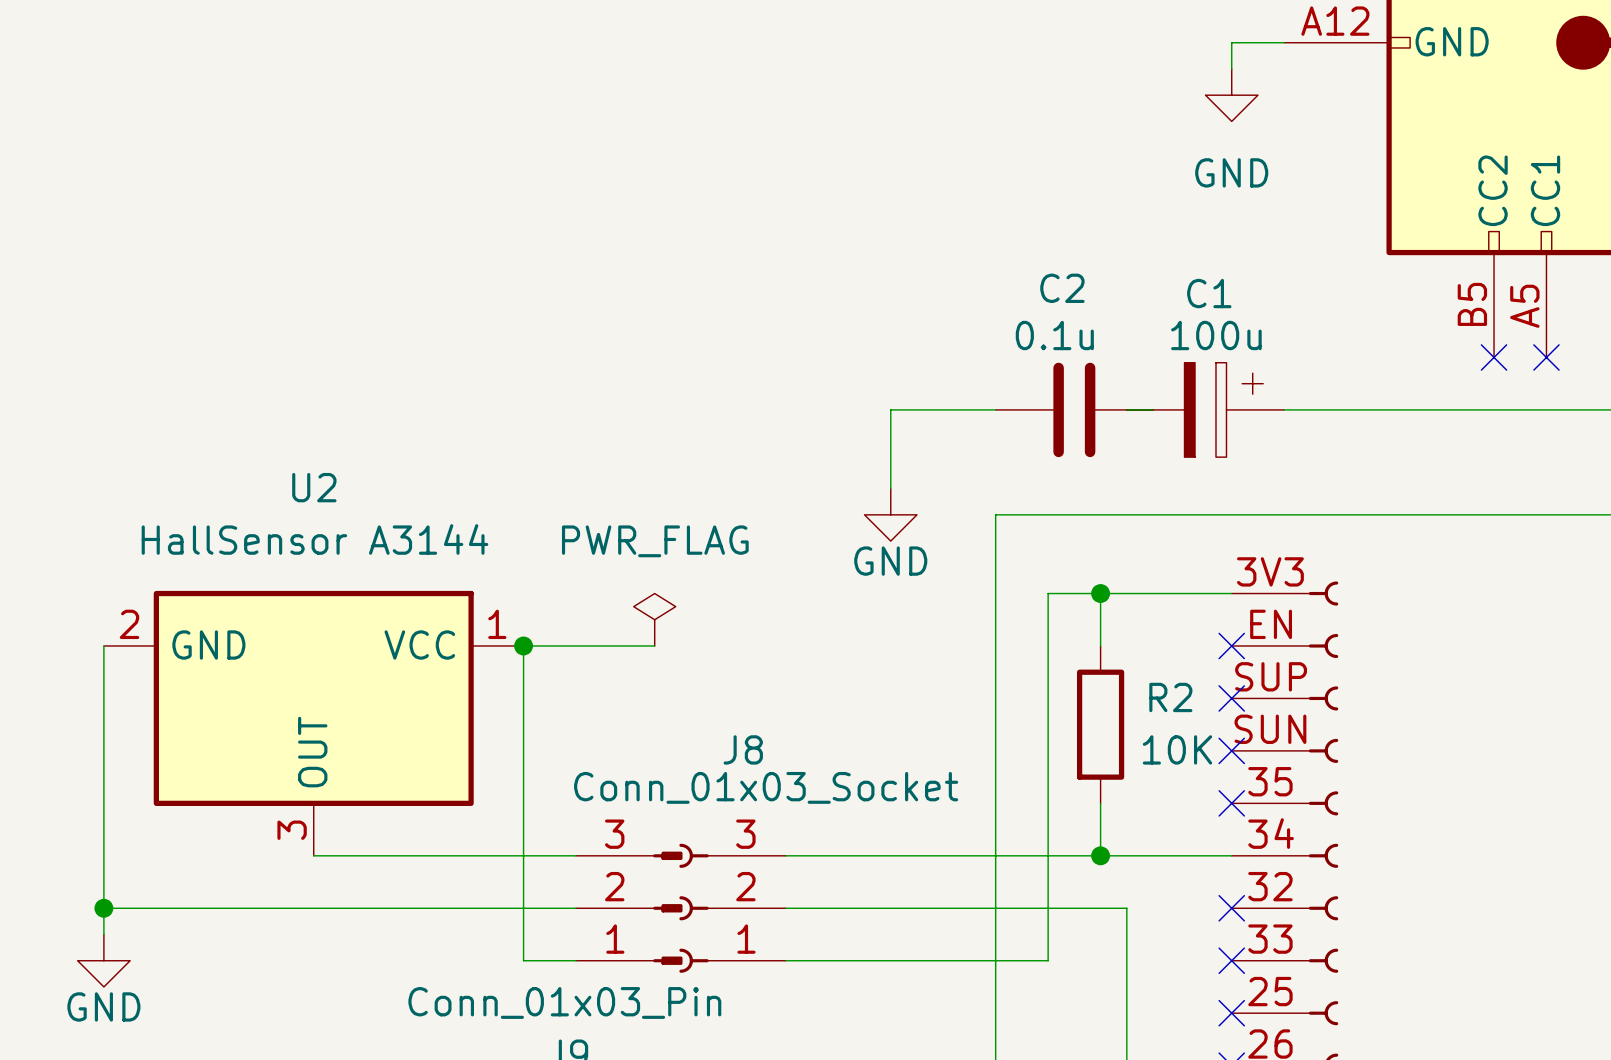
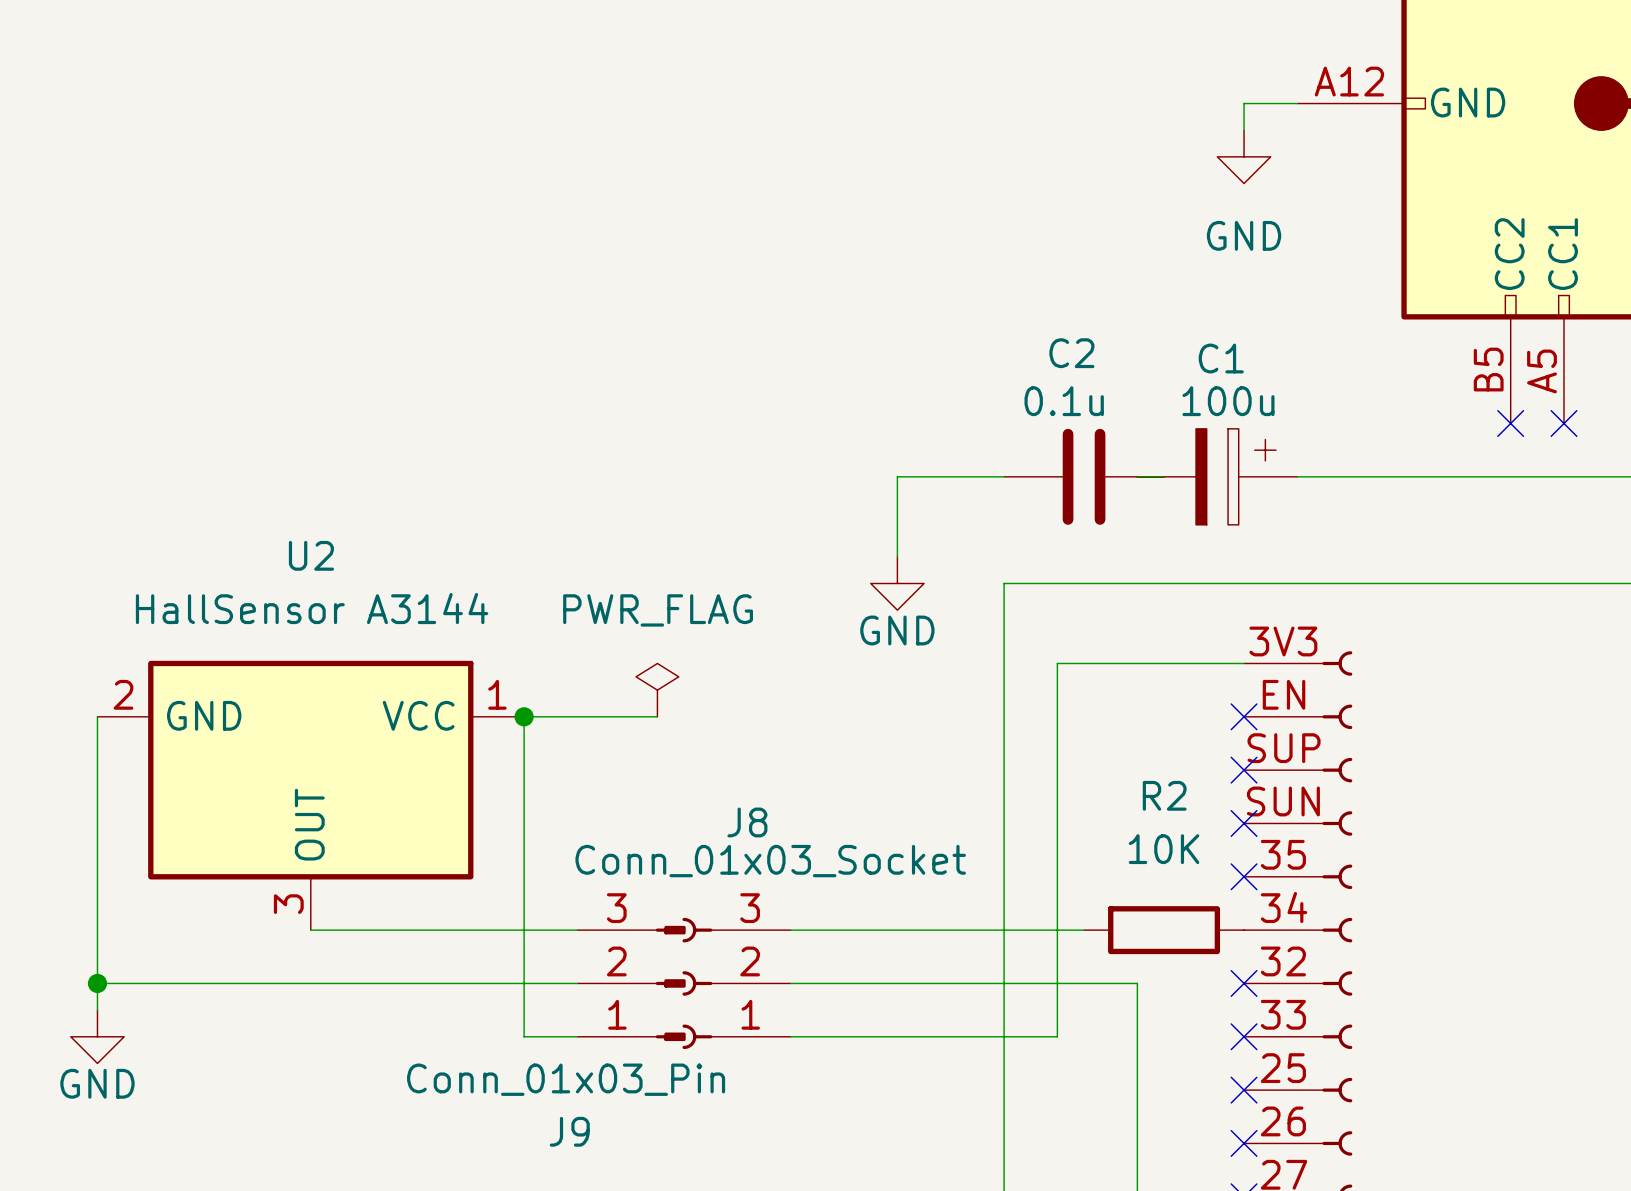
wire: (1100, 593) (1100, 645) -> none
junction: (1100, 593) -> none
R2 name position: R2 (1170, 697) -> R2 (1164, 795)
R2 rotation: 0° (1100, 724) -> 90° clockwise (1164, 930)
R2 position: (1100, 724) -> (1164, 930)
R2 value position: 10K (1177, 749) -> 10K (1164, 849)
wire: (1100, 803) (1100, 855) -> none
wire: (1074, 855) (1231, 855) -> none
junction: (1100, 855) -> none

